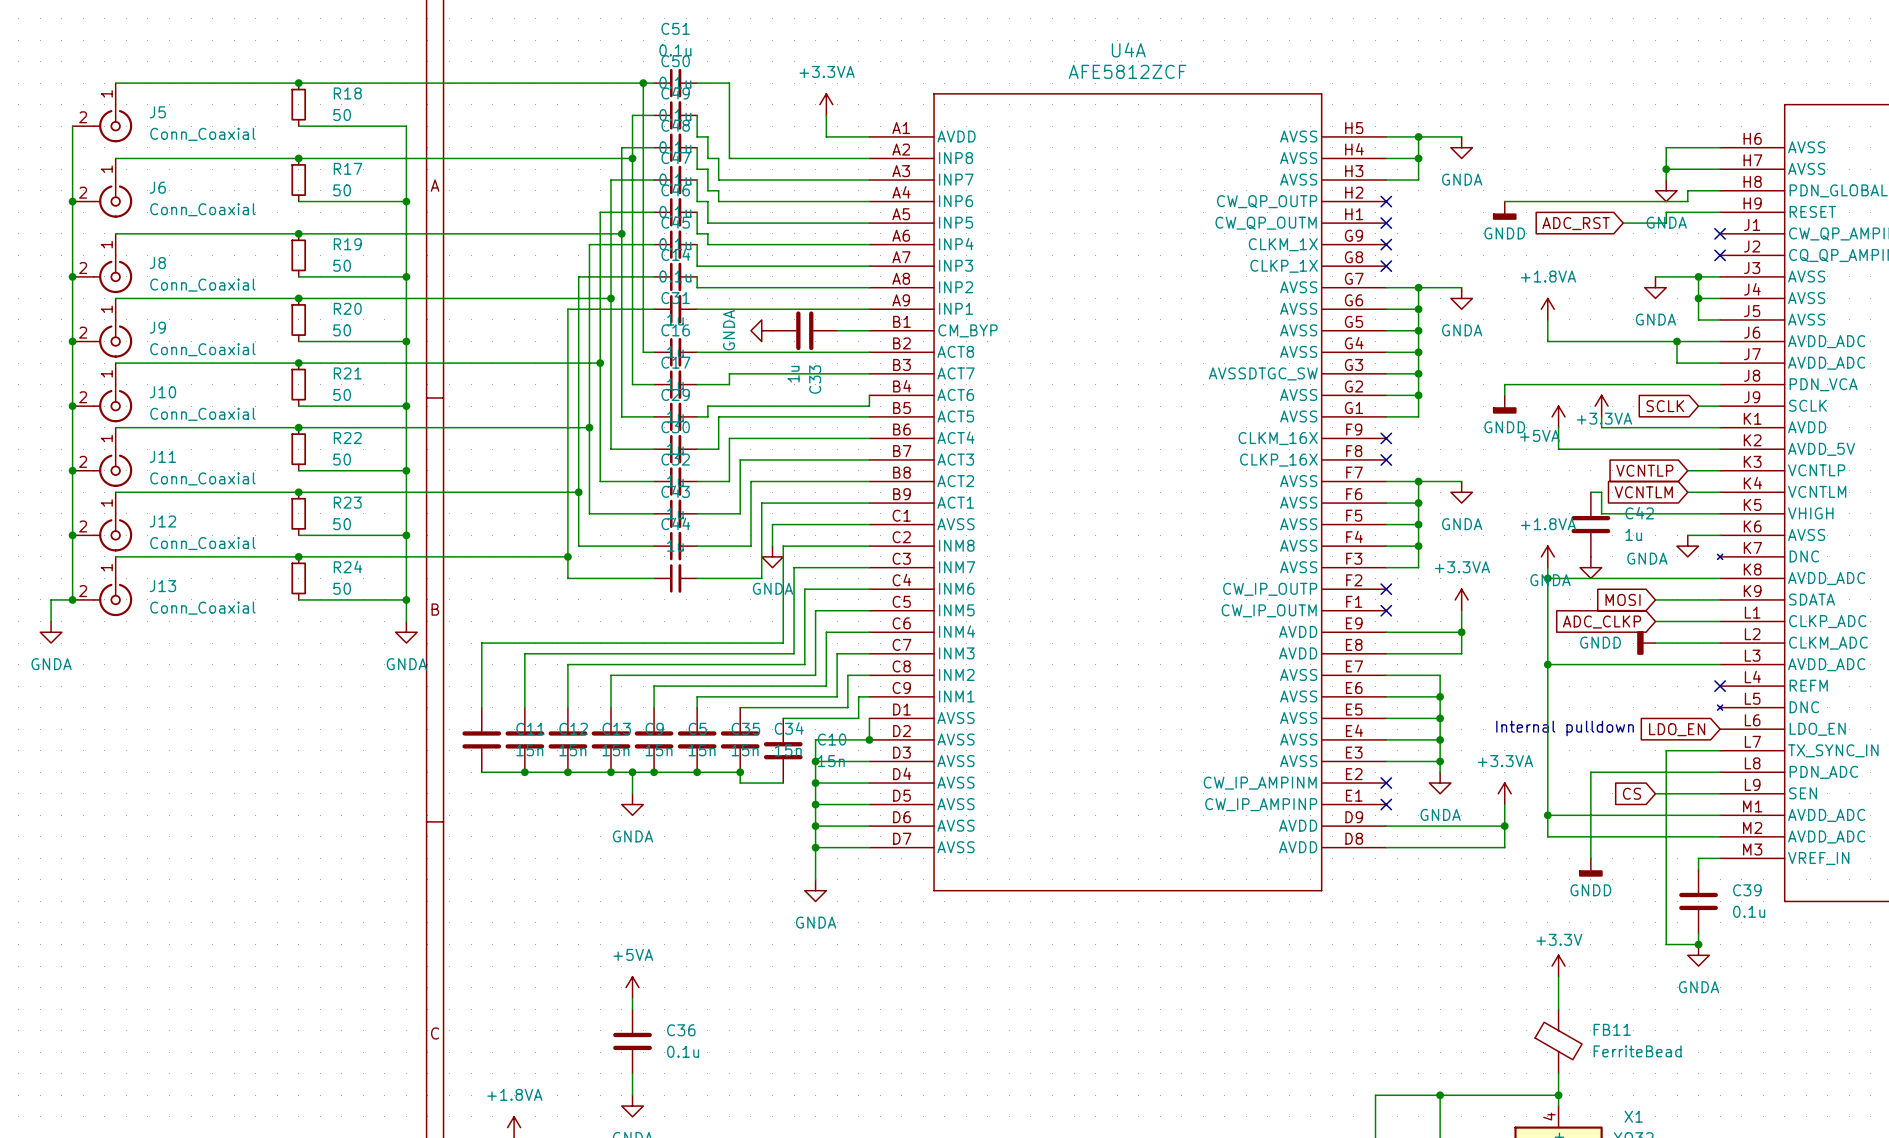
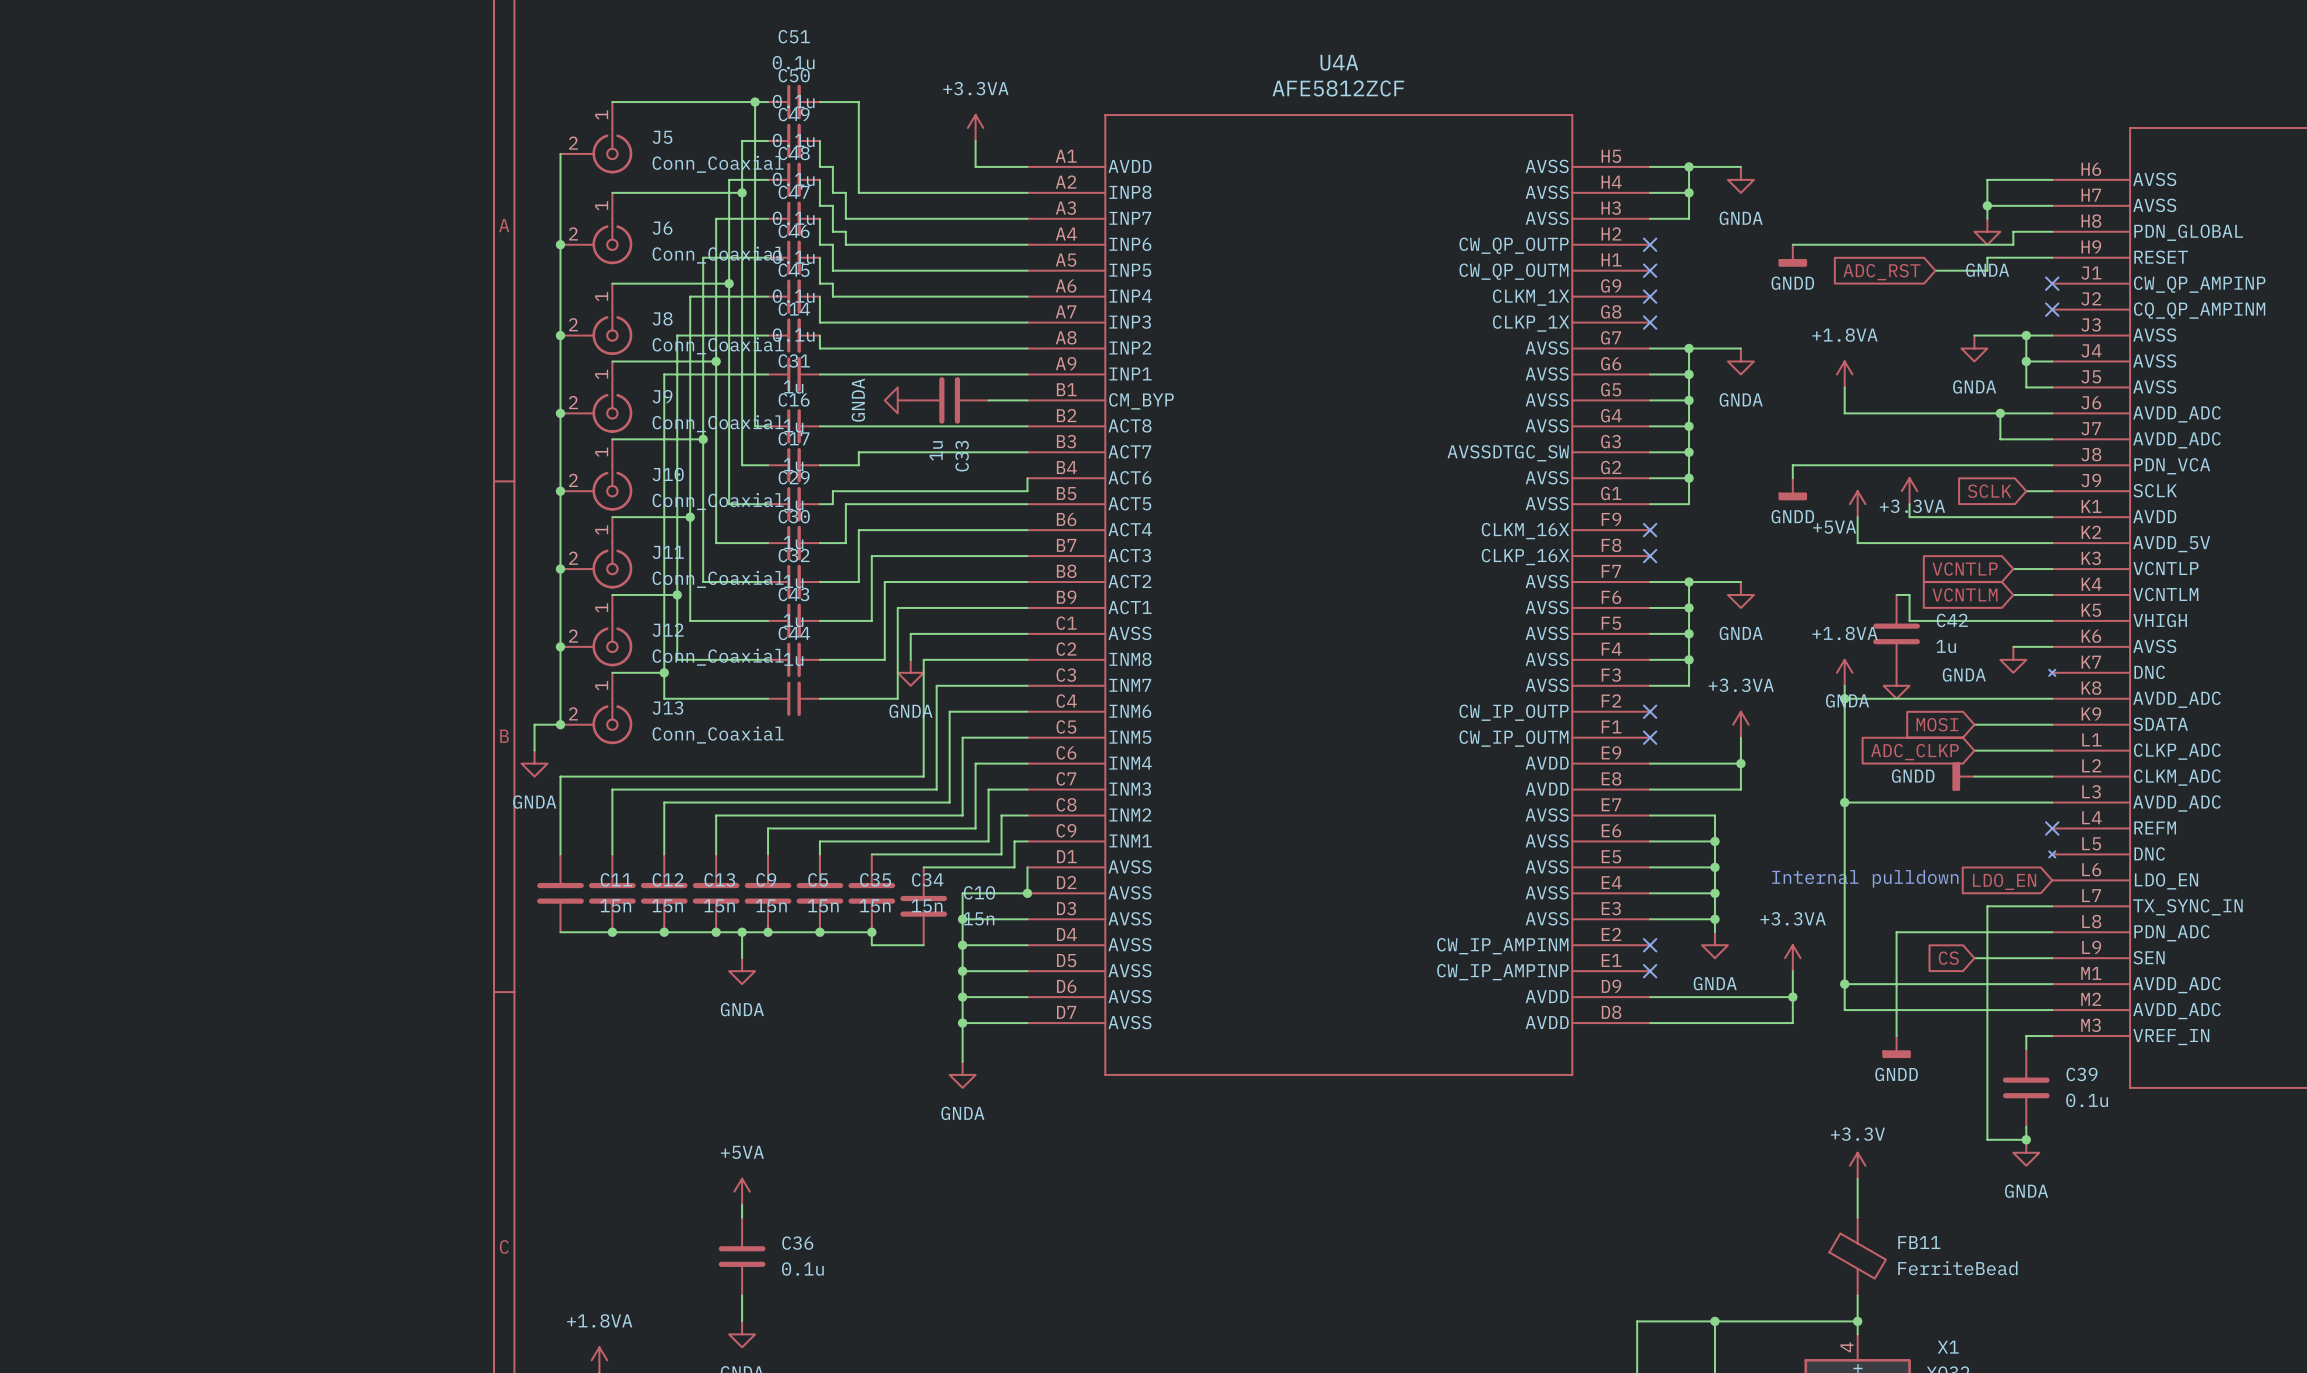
wire: (115, 83) (524, 83) -> none
junction: (298, 83) -> none
R18: 50 (298, 104) -> none
J5 position: (102, 112) -> (596, 137)
wire: (72, 126) (72, 599) (51, 599) (51, 621) -> none
wire: (298, 126) (406, 126) (406, 621) -> none
wire: none -> (560, 153) (560, 724) (534, 724) (534, 750)
wire: (115, 158) (524, 158) -> none
junction: (298, 158) -> none
R17: 50 (298, 180) -> none
J6 position: (102, 188) -> (596, 228)
junction: (72, 201) -> none
wire: (298, 201) (406, 201) -> none
junction: (406, 201) -> none
junction: none -> (560, 244)
wire: (115, 233) (524, 233) -> none
junction: (298, 233) -> none
R19: 50 (298, 255) -> none
J8 position: (102, 263) -> (596, 319)
junction: (72, 276) -> none
wire: (298, 276) (406, 276) -> none
junction: (406, 276) -> none
junction: none -> (560, 335)
wire: (115, 298) (524, 298) -> none
junction: (298, 298) -> none
R20: 50 (298, 319) -> none
J9 position: (102, 328) -> (596, 397)
junction: (72, 341) -> none
wire: (298, 341) (406, 341) -> none
junction: (406, 341) -> none
junction: none -> (560, 413)
wire: (115, 363) (524, 363) -> none
junction: (298, 363) -> none
R21: 50 (298, 384) -> none
J10 position: (102, 392) -> (596, 474)
junction: (72, 406) -> none
wire: (298, 406) (406, 406) -> none
junction: (406, 406) -> none
junction: none -> (560, 491)
wire: (115, 427) (524, 427) -> none
junction: (298, 427) -> none
R22: 50 (298, 449) -> none
J11 position: (102, 457) -> (596, 552)
junction: (72, 470) -> none
wire: (298, 470) (406, 470) -> none
junction: (406, 470) -> none
junction: none -> (560, 569)
wire: (115, 492) (524, 492) -> none
junction: (298, 492) -> none
R23: 50 (298, 513) -> none
J12 position: (102, 521) -> (596, 630)
junction: (72, 535) -> none
wire: (298, 535) (406, 535) -> none
junction: (406, 535) -> none
junction: none -> (560, 646)
wire: (115, 556) (524, 556) -> none
junction: (298, 556) -> none
R24: 50 (298, 578) -> none
J13 position: (102, 586) -> (596, 708)
junction: (72, 599) -> none
wire: (298, 599) (406, 599) -> none
junction: (406, 599) -> none
junction: none -> (560, 724)
power symbol: GNDA (51, 632) -> none
power symbol position: GNDA (406, 632) -> GNDA (534, 763)

